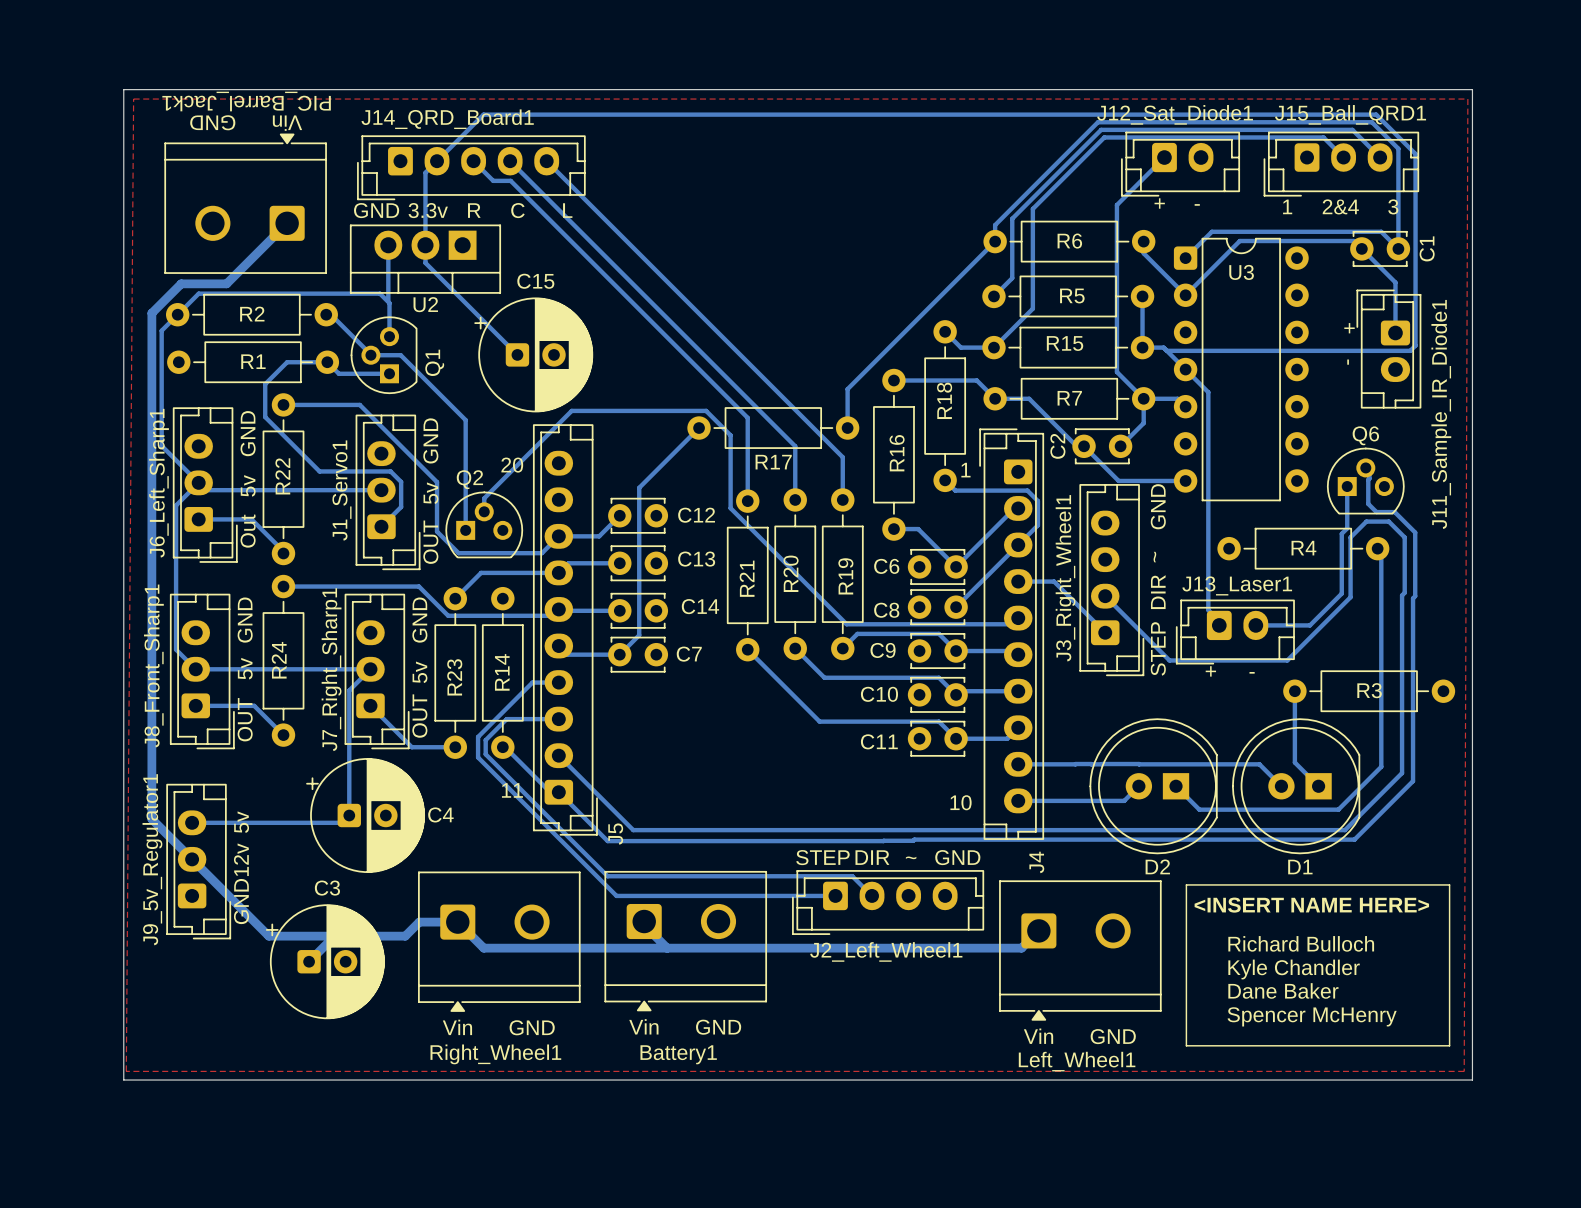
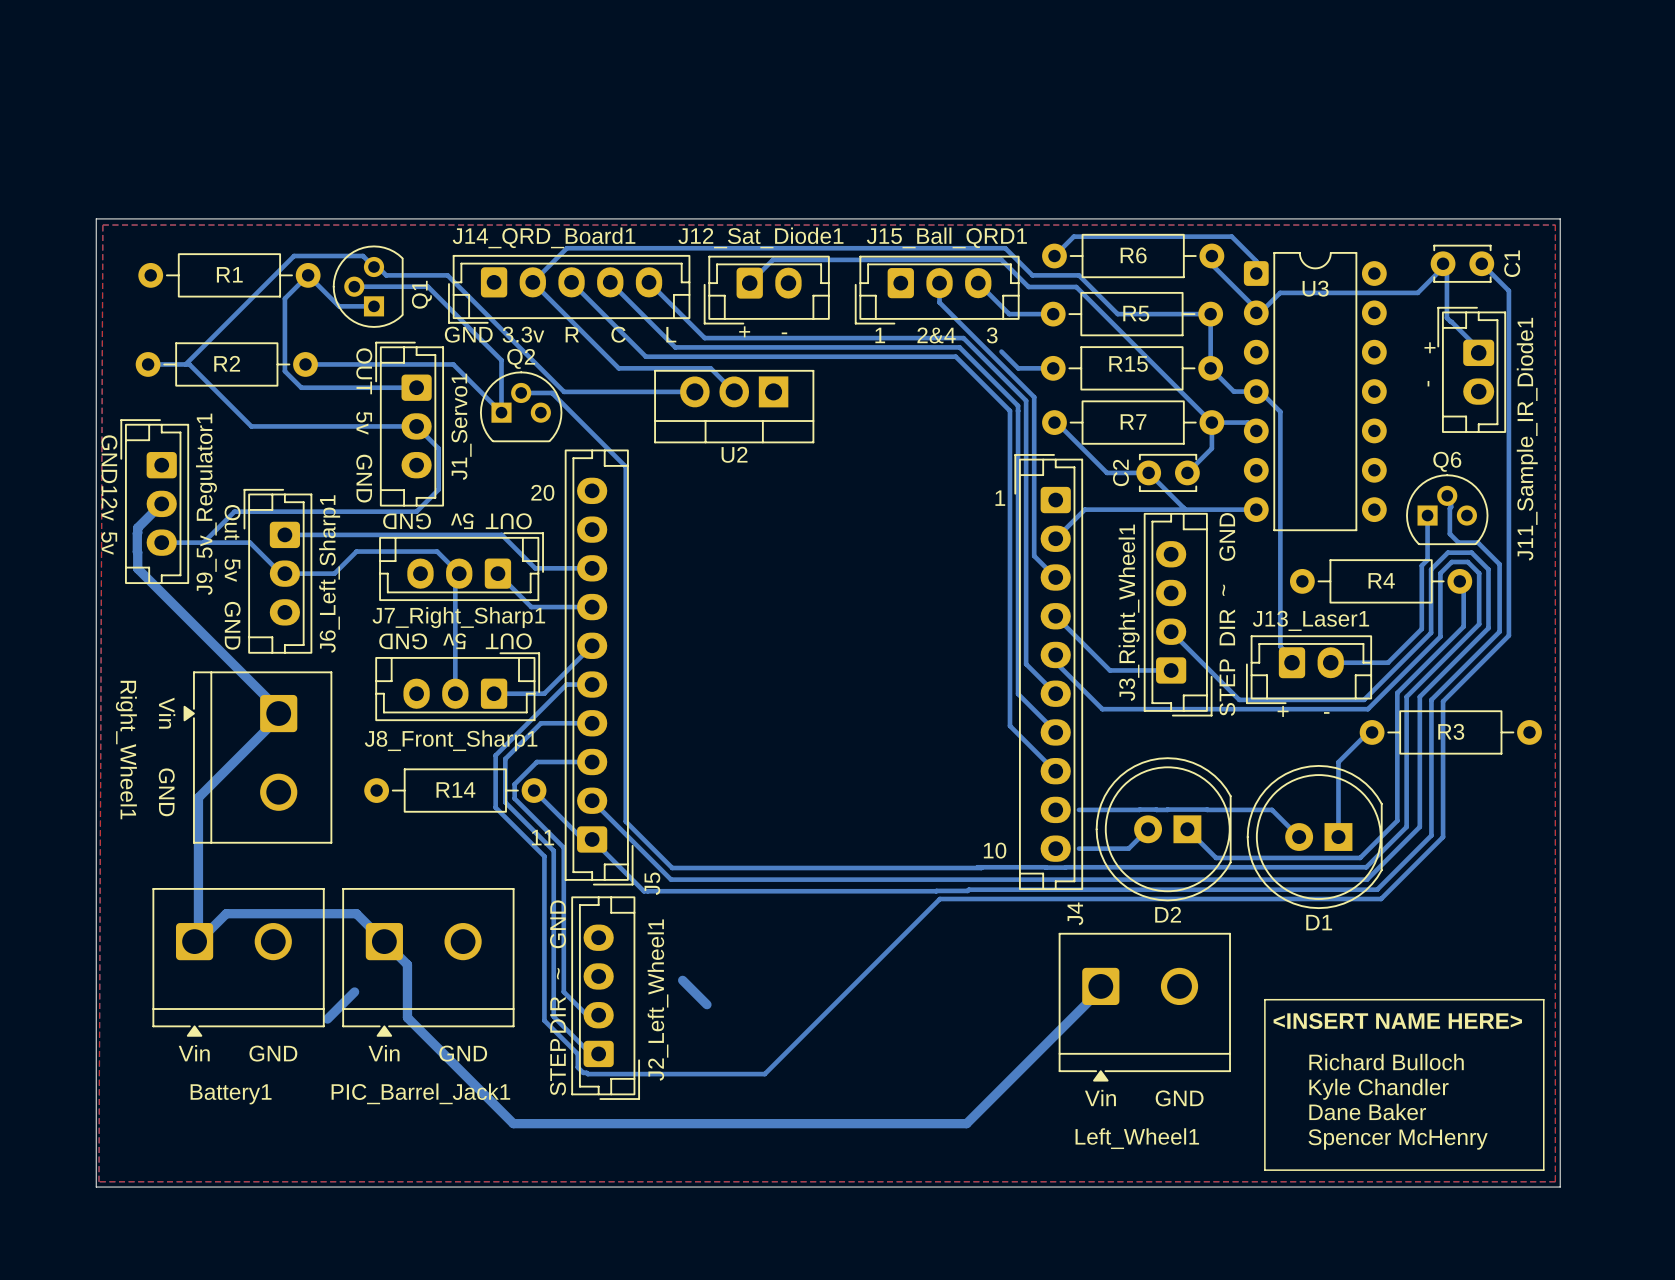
top zone outline: (133, 99) (1467, 99) (1464, 1071) (126, 1071) (133, 99) -> (102, 225) (98, 1181) (1555, 1181) (1555, 225) (102, 225)
PIC_Barrel_Jack1 name position: PIC_Barrel_Jack1 (246, 101) -> PIC_Barrel_Jack1 (420, 1093)
PIC_Barrel_Jack1 footprint: [164, 133, 327, 274] -> [342, 888, 515, 1037]
bottom track: (1164, 157) (1116, 205) (1116, 372) -> (749, 283) (772, 259) (1001, 259) (1028, 287) (1076, 287) (1183, 394)
bottom track: (1343, 157) (1323, 137) (1104, 137) (1032, 208) (1032, 308) (993, 347) -> none
bottom track: (1380, 157) (1352, 129) (1101, 129) (1012, 218) (1012, 278) (993, 296) -> (978, 283) (1009, 314) (1053, 314)
bottom track: (473, 161) (493, 180) (510, 180) (747, 417) (747, 501) -> none
bottom track: (510, 161) (795, 446) (795, 499) -> none
bottom track: (546, 161) (842, 457) (842, 499) -> none
J12_Sat_Diode1 position: (1180, 164) -> (766, 290)
J15_Ball_QRD1 position: (1341, 164) -> (937, 290)
J14_QRD_Board1 position: (471, 167) -> (569, 289)
board edge: (1472, 206) (1472, 89) (123, 89) (123, 1080) (1472, 1080) -> (1560, 218) (96, 218) (96, 1187) (1560, 1187) (1560, 1144)
bottom track: (287, 223) (226, 283) (181, 283) (151, 313) (151, 819) (268, 936) (405, 936) (419, 922) (457, 922) (483, 948) (1021, 948) (1038, 930) -> none
bottom track: (388, 245) (388, 301) -> none
bottom track: (1143, 249) (1143, 253) (1185, 295) (1239, 241) (1353, 241) (1395, 282) (1395, 332) -> (1211, 264) (1260, 312) (1280, 292) (1417, 292) (1446, 263) (1446, 317) (1482, 352)
bottom track: none -> (373, 267) (362, 255) (294, 255) (185, 364)
bottom track: (1185, 258) (1211, 231) (1381, 231) (1398, 248) (1398, 148) (1371, 122) (1097, 122) (995, 225) (995, 241) (847, 389) (847, 428) -> (1256, 273) (1256, 261) (1231, 236) (1073, 236) (1054, 256)
U2 position: (425, 259) -> (734, 406)
bottom track: (425, 262) (425, 172) (483, 114) (1376, 114) (1415, 153) (1415, 345) (1410, 350) (1166, 350) -> (450, 278) (447, 275) (386, 275) (377, 267)
bottom track: none -> (571, 282) (645, 356) (955, 356) (1009, 410) (1009, 725) (1055, 771)
bottom track: none -> (610, 282) (675, 347) (959, 347) (1018, 405) (1018, 693) (1055, 732)
bottom track: none -> (649, 282) (704, 338) (963, 338) (1026, 400) (1026, 664) (1055, 693)
bottom track: none -> (939, 283) (939, 302) (1034, 397) (1034, 555) (1055, 577)
bottom track: none -> (358, 286) (427, 286) (501, 360) (501, 412) (453, 364) (305, 364)
bottom track: none -> (373, 306) (339, 306) (308, 275) (284, 298) (284, 371) (301, 387) (416, 387)
bottom track: none -> (1210, 314) (1117, 314) (1078, 275) (1032, 275) (1005, 248) (566, 248) (532, 282) (618, 368) (710, 368) (734, 391)
R2 position: (251, 314) -> (226, 364)
bottom track: (326, 314) (331, 314) (370, 355) (400, 355) (465, 420) (465, 530) -> none
bottom track: (389, 336) (389, 303) (380, 293) (198, 293) (161, 330) (161, 445) (206, 490) (378, 490) -> none
bottom track: none -> (148, 364) (189, 364) (251, 426) (420, 426)
bottom track: (1142, 347) (1163, 347) (1208, 392) -> (1210, 368) (1233, 391) (1260, 391) (1280, 411) (1280, 415)
bottom track: none -> (548, 376) (564, 391) (694, 391)
C15: (533, 354) -> none
Q1 position: (384, 355) -> (368, 286)
R1 position: (253, 362) -> (229, 275)
bottom track: none -> (521, 392) (552, 392) (625, 466) (625, 821) (672, 868) (982, 867)
bottom track: (389, 373) (338, 373) (327, 362) (287, 362) (265, 384) (265, 417) (319, 471) (390, 471) (401, 481) (401, 507) (381, 526) -> none
bottom track: (893, 380) (976, 380) (995, 398) (1029, 398) (1076, 446) -> (1052, 418) (1107, 472) (1140, 472)
bottom track: none -> (416, 426) (438, 448) (438, 489) (416, 511) (234, 511) (203, 542)
bottom track: (285, 404) (359, 404) (437, 482) (437, 531) (458, 553) (542, 553) (558, 536) -> (284, 534) (501, 534) (535, 568) (592, 568)
R18: (945, 406) -> none
bottom track: (706, 410) (571, 410) (484, 498) (484, 511) -> none
bottom track: (706, 411) (730, 435) (730, 508) (846, 624) (1012, 624) (1018, 618) -> none
bottom track: (699, 428) (639, 487) (639, 635) (619, 654) (567, 654) (558, 646) -> (1481, 263) (1508, 290) (1508, 635) (1443, 701) (1443, 837) (1381, 899) (939, 899) (764, 1074) (587, 1074) (577, 1067) (577, 1054) (544, 1020) (544, 856) (495, 807) (495, 755) (566, 684) (592, 684)
R17: (773, 428) -> none
R16: (893, 454) -> none
bottom track: none -> (161, 503) (137, 527) (137, 568) (282, 713) (198, 797) (198, 941) (226, 913) (356, 913) (407, 964) (407, 1017) (513, 1123) (966, 1123) (1103, 986)
R22: (283, 479) -> none
Q2 name position: Q2 (469, 479) -> Q2 (521, 358)
bottom track: (945, 480) (955, 490) (1027, 490) (1037, 501) (1037, 525) (956, 607) -> none
bottom track: none -> (1185, 509) (1084, 509) (1055, 538)
bottom track: (198, 482) (176, 505) (176, 649) (195, 669) (367, 669) (374, 661) -> none
J6_Left_Sharp1 rotation: 0° (205, 485) -> 180° (277, 571)
J1_Servo1 rotation: 0° (388, 492) -> 180° (409, 424)
bottom track: (1018, 508) (1014, 508) (956, 566) (918, 529) (893, 529) -> none
bottom track: none -> (161, 542) (250, 542) (281, 573) (334, 573) (356, 551) (437, 551) (459, 573) (455, 577) (455, 693)
bottom track: (619, 515) (599, 536) (562, 536) -> none
C12: (638, 515) -> none
bottom track: (198, 519) (251, 519) (285, 553) -> none
Q2 position: (484, 524) -> (521, 406)
bottom track: (619, 563) (568, 563) (558, 572) -> none
C13: (638, 563) -> none
C6: (937, 566) -> none
bottom track: (501, 572) (481, 572) (455, 598) -> (531, 607) (497, 573)
R20: (795, 574) -> none
R19: (842, 574) -> none
R21: (747, 575) -> none
bottom track: (1018, 581) (1054, 581) (1105, 632) -> (1055, 616) (1109, 670) (1171, 670)
bottom track: (283, 586) (418, 586) (448, 615) (552, 615) -> (494, 693) (544, 693) (585, 652)
bottom track: (1381, 591) (1381, 766) (1338, 809) (1283, 809) -> (1463, 626) (1397, 692) (1397, 820) (1360, 857)
bottom track: (1402, 595) (1402, 773) (1345, 830) (1290, 830) -> (1485, 630) (1419, 696) (1419, 826) (1367, 879)
bottom track: (1413, 598) (1413, 781) (1354, 839) (1299, 839) -> (1497, 634) (1431, 699) (1431, 835) (1377, 889)
C8: (937, 607) -> none
bottom track: (558, 609) (619, 610) -> none
C14: (638, 610) -> none
bottom track: none -> (1055, 654) (1055, 662) (1102, 709) (1367, 709) (1440, 636) (1440, 573) (1451, 561) (1467, 561) (1479, 573) (1479, 624) (1406, 696) (1406, 826) (1366, 867) (977, 867)
J4 position: (1011, 634) -> (1048, 672)
bottom track: (795, 648) (824, 677) (938, 677) (956, 694) (959, 694) (963, 691) (1018, 691) -> none
bottom track: (842, 648) (857, 633) (938, 633) (956, 651) (1014, 651) (1018, 654) -> none
bottom track: (747, 649) (819, 721) (938, 721) (956, 738) (1007, 738) (1018, 727) -> none
C9: (937, 651) -> none
C7: (638, 654) -> none
R24: (283, 660) -> none
bottom track: (370, 669) (349, 690) (349, 815) (341, 822) (192, 822) -> none
J8_Front_Sharp1 rotation: 0° (202, 671) -> 90° counterclockwise (457, 686)
J8_Front_Sharp1 position: (202, 671) -> (457, 686)
J7_Right_Sharp1 rotation: 0° (377, 671) -> 90° counterclockwise (461, 566)
J7_Right_Sharp1 position: (377, 671) -> (461, 566)
R23: (455, 672) -> none
R14 rotation: 0° (502, 672) -> 90° clockwise (455, 790)
R14 position: (502, 672) -> (455, 790)
bottom track: (532, 682) (478, 736) (478, 757) (616, 895) (835, 895) -> (564, 723) (541, 723) (505, 758) (505, 802) (553, 850) (553, 1016) (590, 1053) (605, 1053)
bottom track: none -> (1368, 732) (1338, 762) (1338, 837)
bottom track: (1294, 691) (1294, 762) (1318, 786) -> none
C10: (937, 694) -> none
bottom track: (195, 705) (254, 705) (283, 735) -> none
bottom track: (370, 705) (411, 747) (455, 747) -> none
C11: (937, 738) -> none
bottom track: (485, 753) (607, 876) (852, 876) (872, 895) -> (514, 798) (563, 847) (563, 991) (587, 1015) (605, 1015)
bottom track: (1200, 764) (1259, 764) (1281, 786) -> (1272, 809) (1299, 837)
bottom track: (1138, 786) (1124, 800) (1065, 800) -> (1148, 829) (1128, 848)
D2 position: (1153, 786) -> (1163, 829)
bottom track: (1176, 786) (1199, 809) -> (1187, 829) (1216, 857) (1270, 857)
D1 position: (1296, 786) -> (1314, 837)
C4: (365, 815) -> none
J9_5v_Regulator1 rotation: 0° (198, 861) -> 180° (154, 501)
J9_5v_Regulator1 position: (198, 861) -> (154, 501)
line: (1186, 884) (1449, 884) (1449, 1045) (1186, 1045) (1186, 884) -> (1264, 999) (1543, 999) (1543, 1170) (1264, 1170) (1264, 999)
J2_Left_Wheel1 rotation: 0° (888, 902) -> 90° counterclockwise (605, 998)
J2_Left_Wheel1 position: (888, 902) -> (605, 998)
text position: <INSERT NAME HERE> (1311, 905) -> <INSERT NAME HERE> (1397, 1021)
Right_Wheel1 rotation: 0° (499, 941) -> 90° clockwise (257, 757)
Right_Wheel1 position: (499, 941) -> (257, 757)
Battery1 position: (685, 941) -> (238, 962)
text position: Richard Bulloch (1301, 943) -> Richard Bulloch (1386, 1062)
C3: (325, 961) -> none
text position: Kyle Chandler (1294, 969) -> Kyle Chandler (1378, 1089)
text position: Dane Baker (1283, 990) -> Dane Baker (1367, 1112)
text position: Spencer McHenry (1312, 1016) -> Spencer McHenry (1398, 1139)
Battery1 name position: Battery1 (678, 1054) -> Battery1 (231, 1094)
Left_Wheel1 name position: Left_Wheel1 (1077, 1061) -> Left_Wheel1 (1137, 1138)

